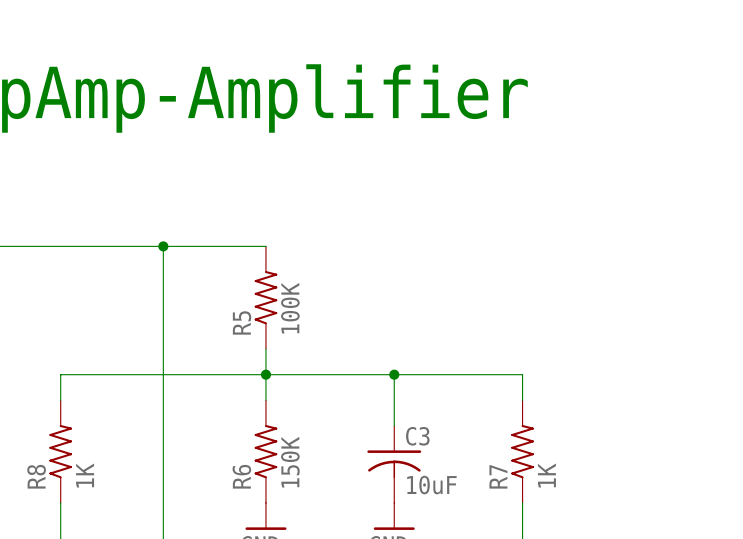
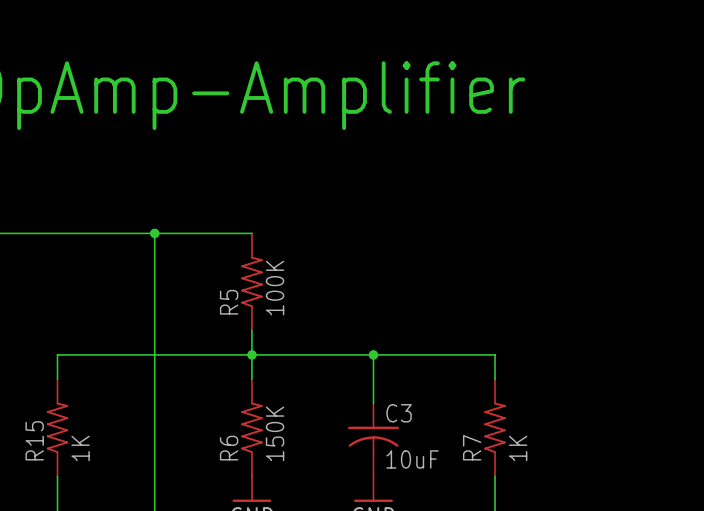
R8 name: R8 (36, 476) -> R15 (34, 440)

